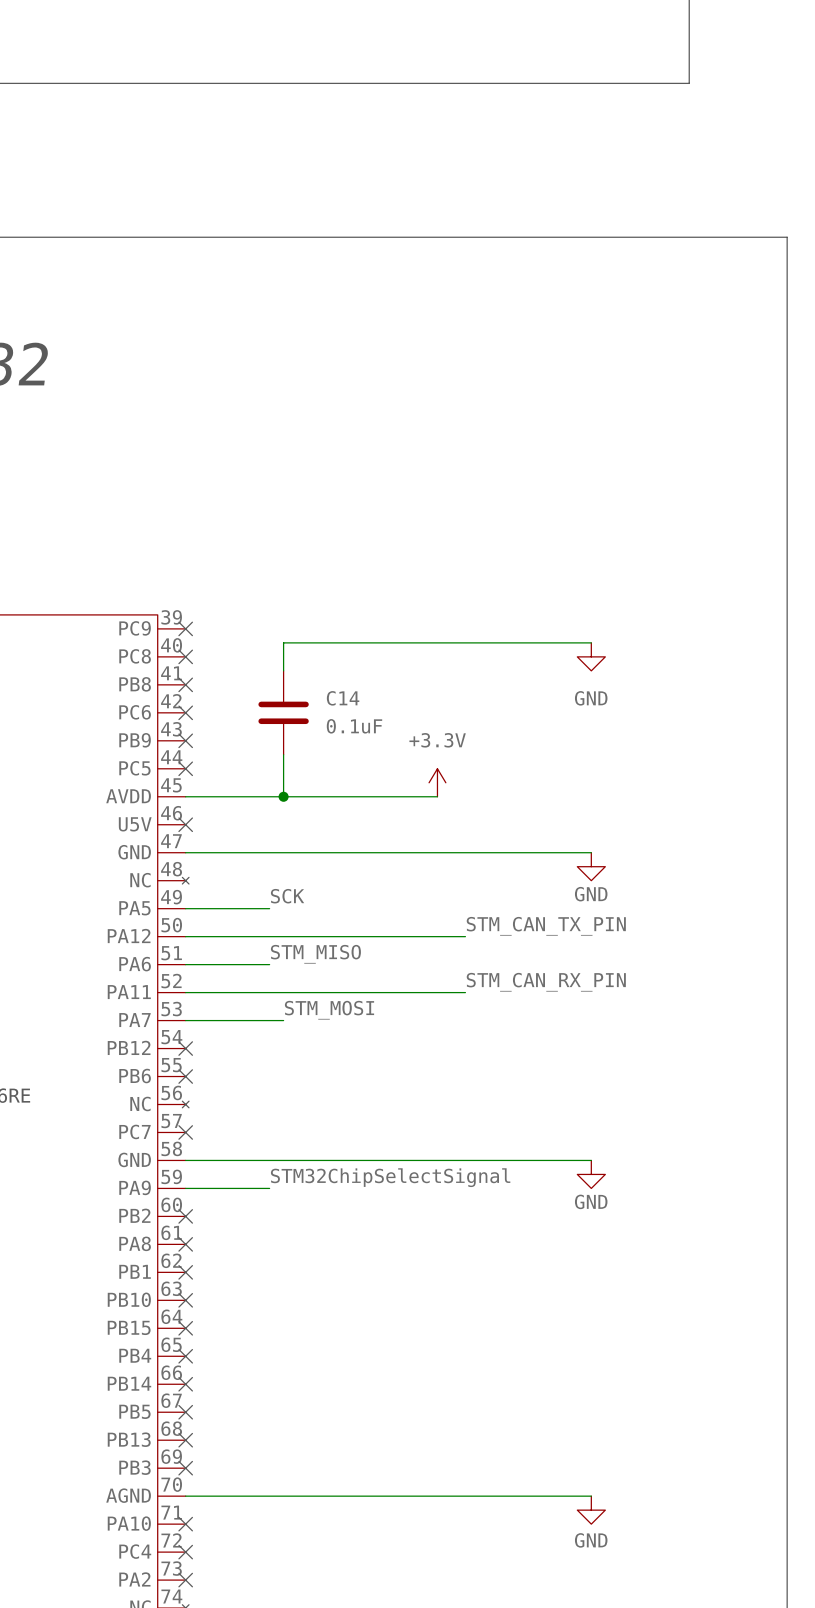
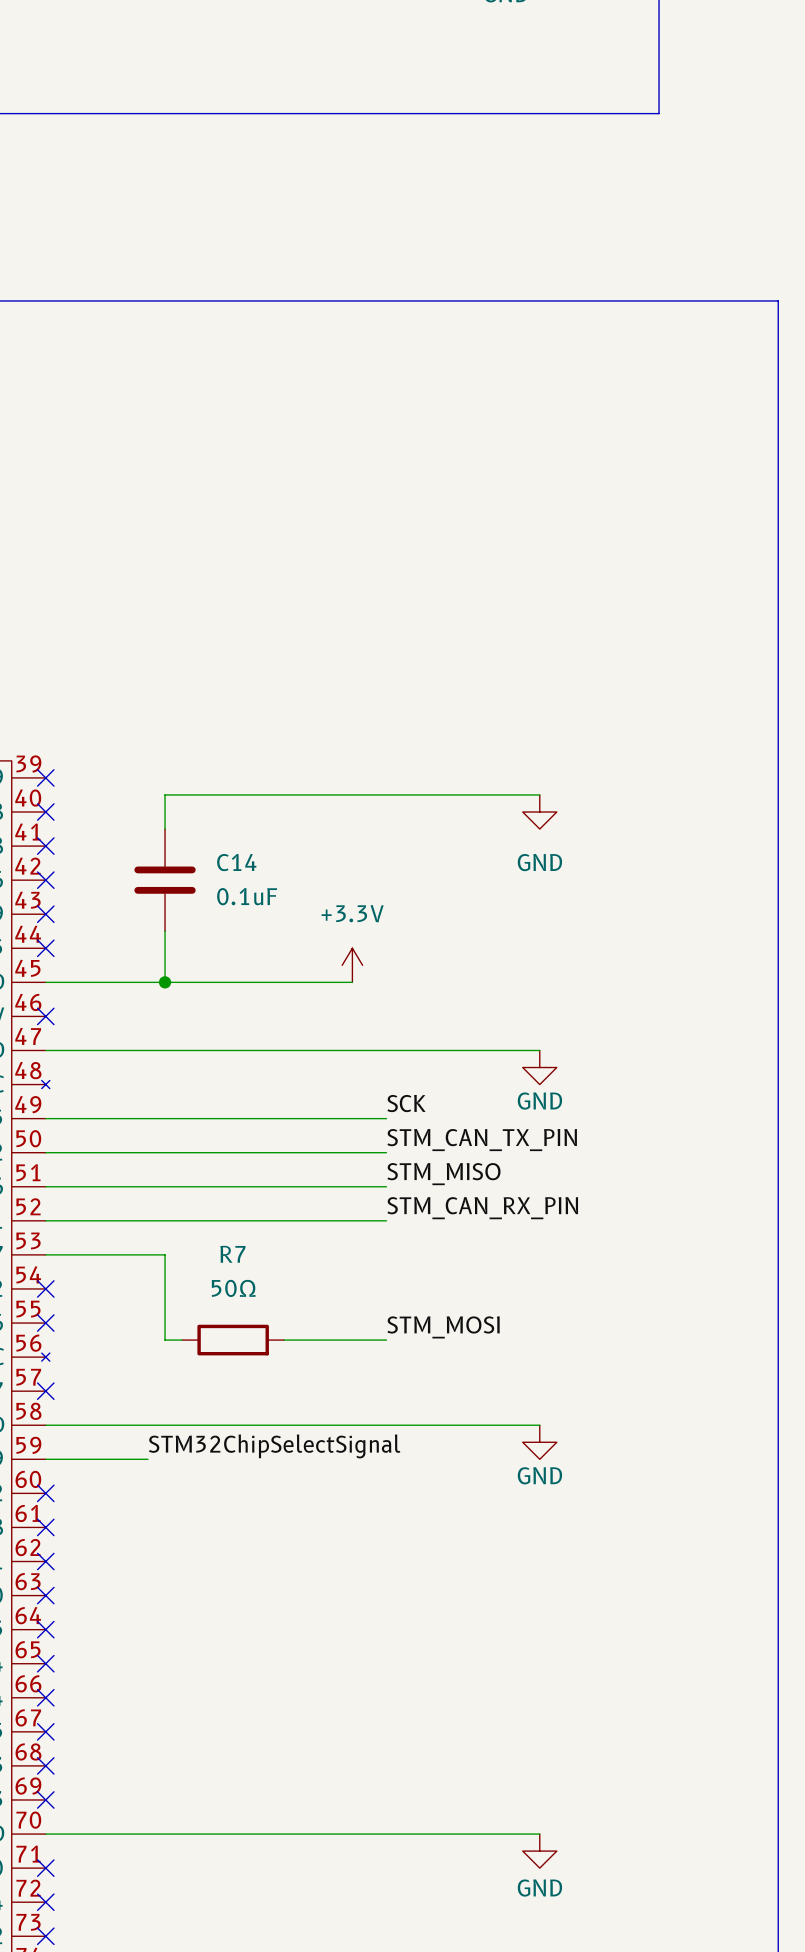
label position: SCK (287, 896) -> SCK (406, 1103)
wire: none -> (147, 1118) (386, 1118)
label position: STM_MISO (315, 954) -> STM_MISO (443, 1174)
wire: none -> (147, 1186) (386, 1186)
label position: STM_MOSI (329, 1010) -> STM_MOSI (443, 1327)
wire: none -> (165, 1254) (165, 1340) (182, 1340)
R7: none -> 50Ω (233, 1340)
wire: none -> (284, 1340) (386, 1340)

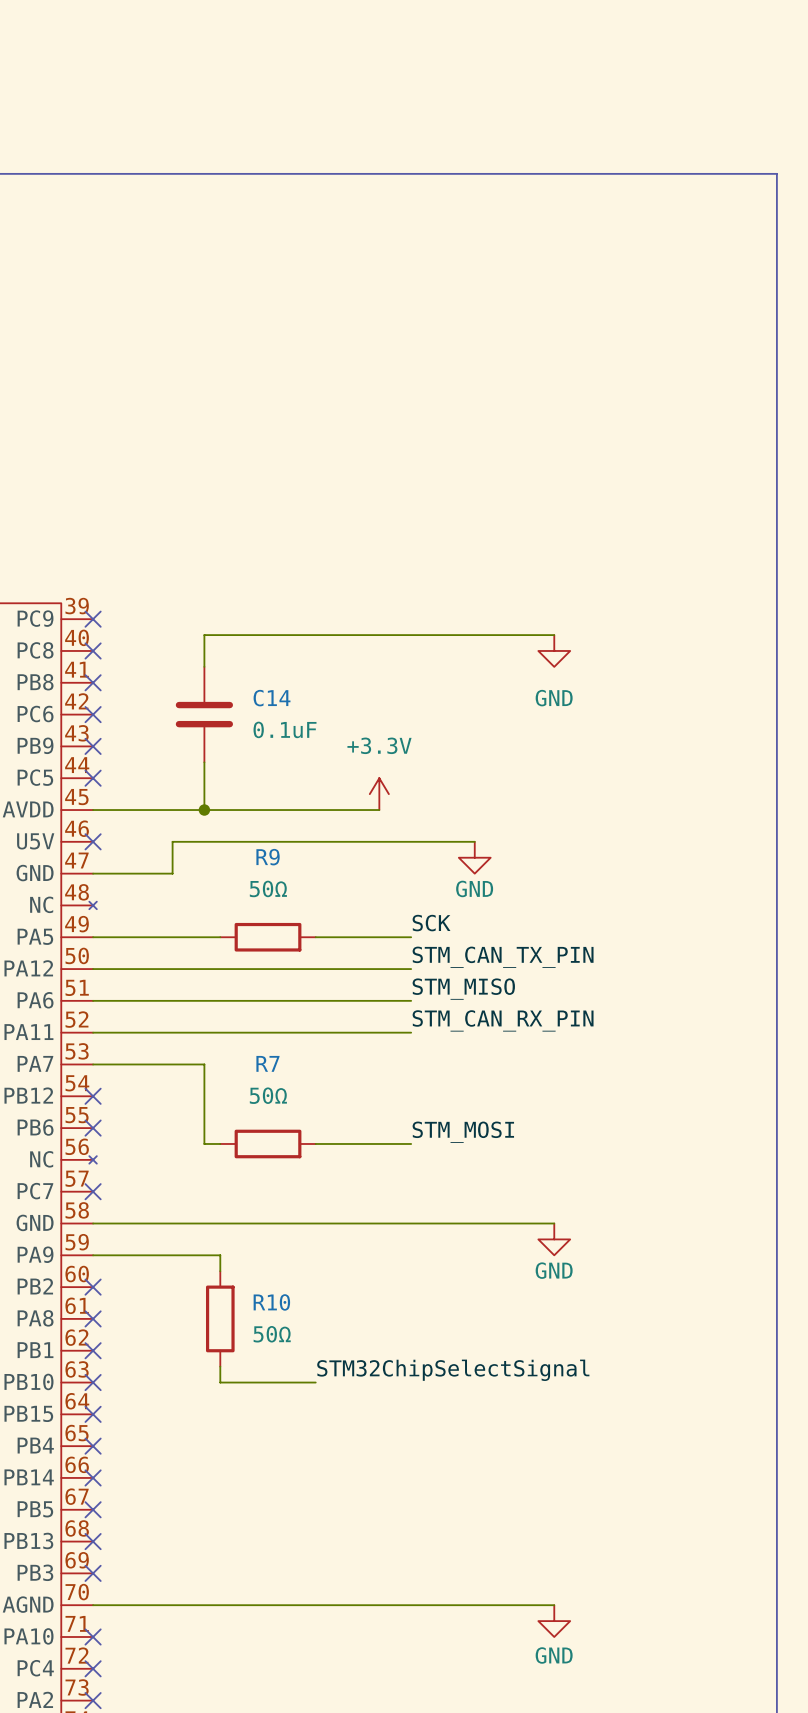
wire: (130, 1050) (539, 1050) -> (172, 873) (172, 841) (474, 841)
power symbol position: GND (539, 1067) -> GND (474, 857)
wire: (182, 1118) (284, 1118) -> none
R9: none -> 50Ω (268, 937)
label position: STM32ChipSelectSignal (274, 1446) -> STM32ChipSelectSignal (453, 1370)
wire: none -> (188, 1255) (220, 1255) (220, 1271)
R10: none -> 50Ω (220, 1318)
wire: none -> (220, 1366) (220, 1382) (315, 1382)

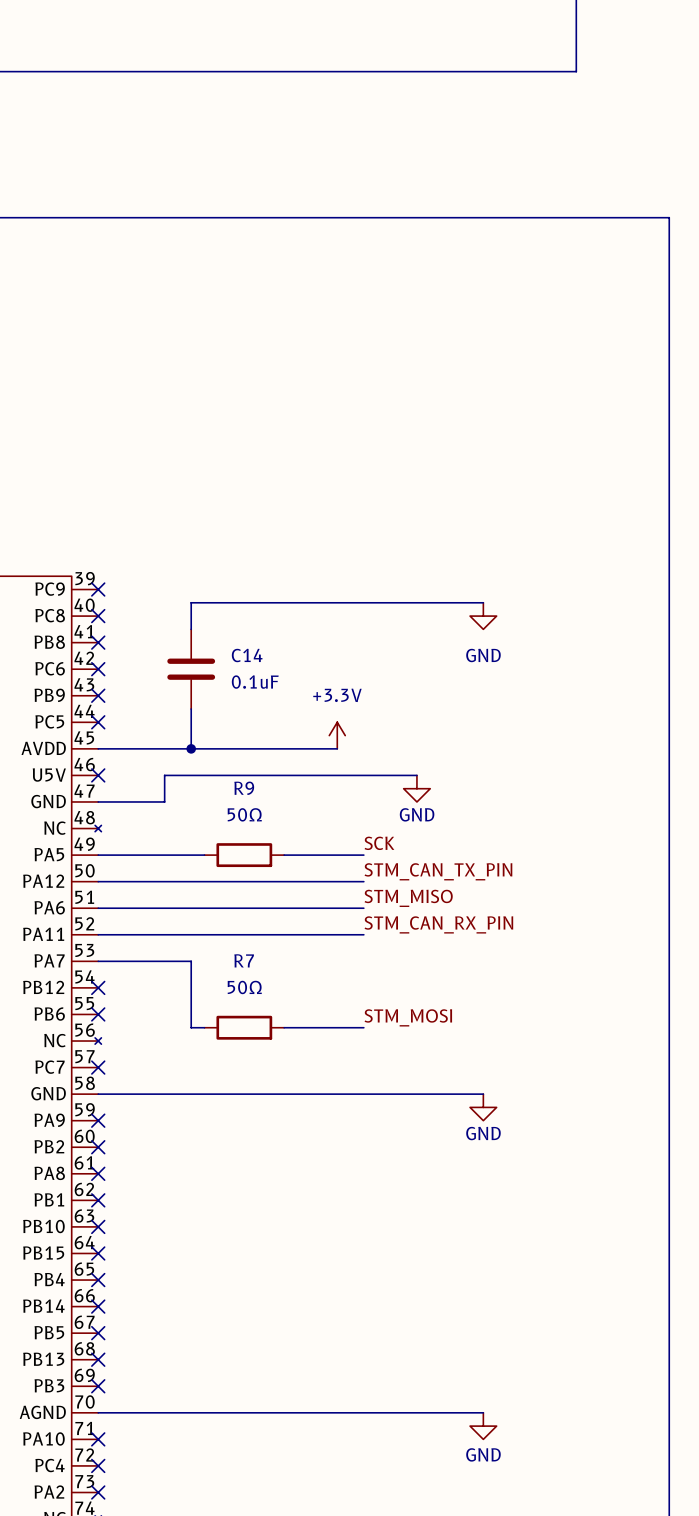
wire: (93, 1255) (220, 1255) (220, 1271) -> none
no-connect mark: none -> (98, 1120)
R10: 50Ω (220, 1318) -> none
wire: (220, 1366) (220, 1382) (315, 1382) -> none
label: STM32ChipSelectSignal (453, 1370) -> none

